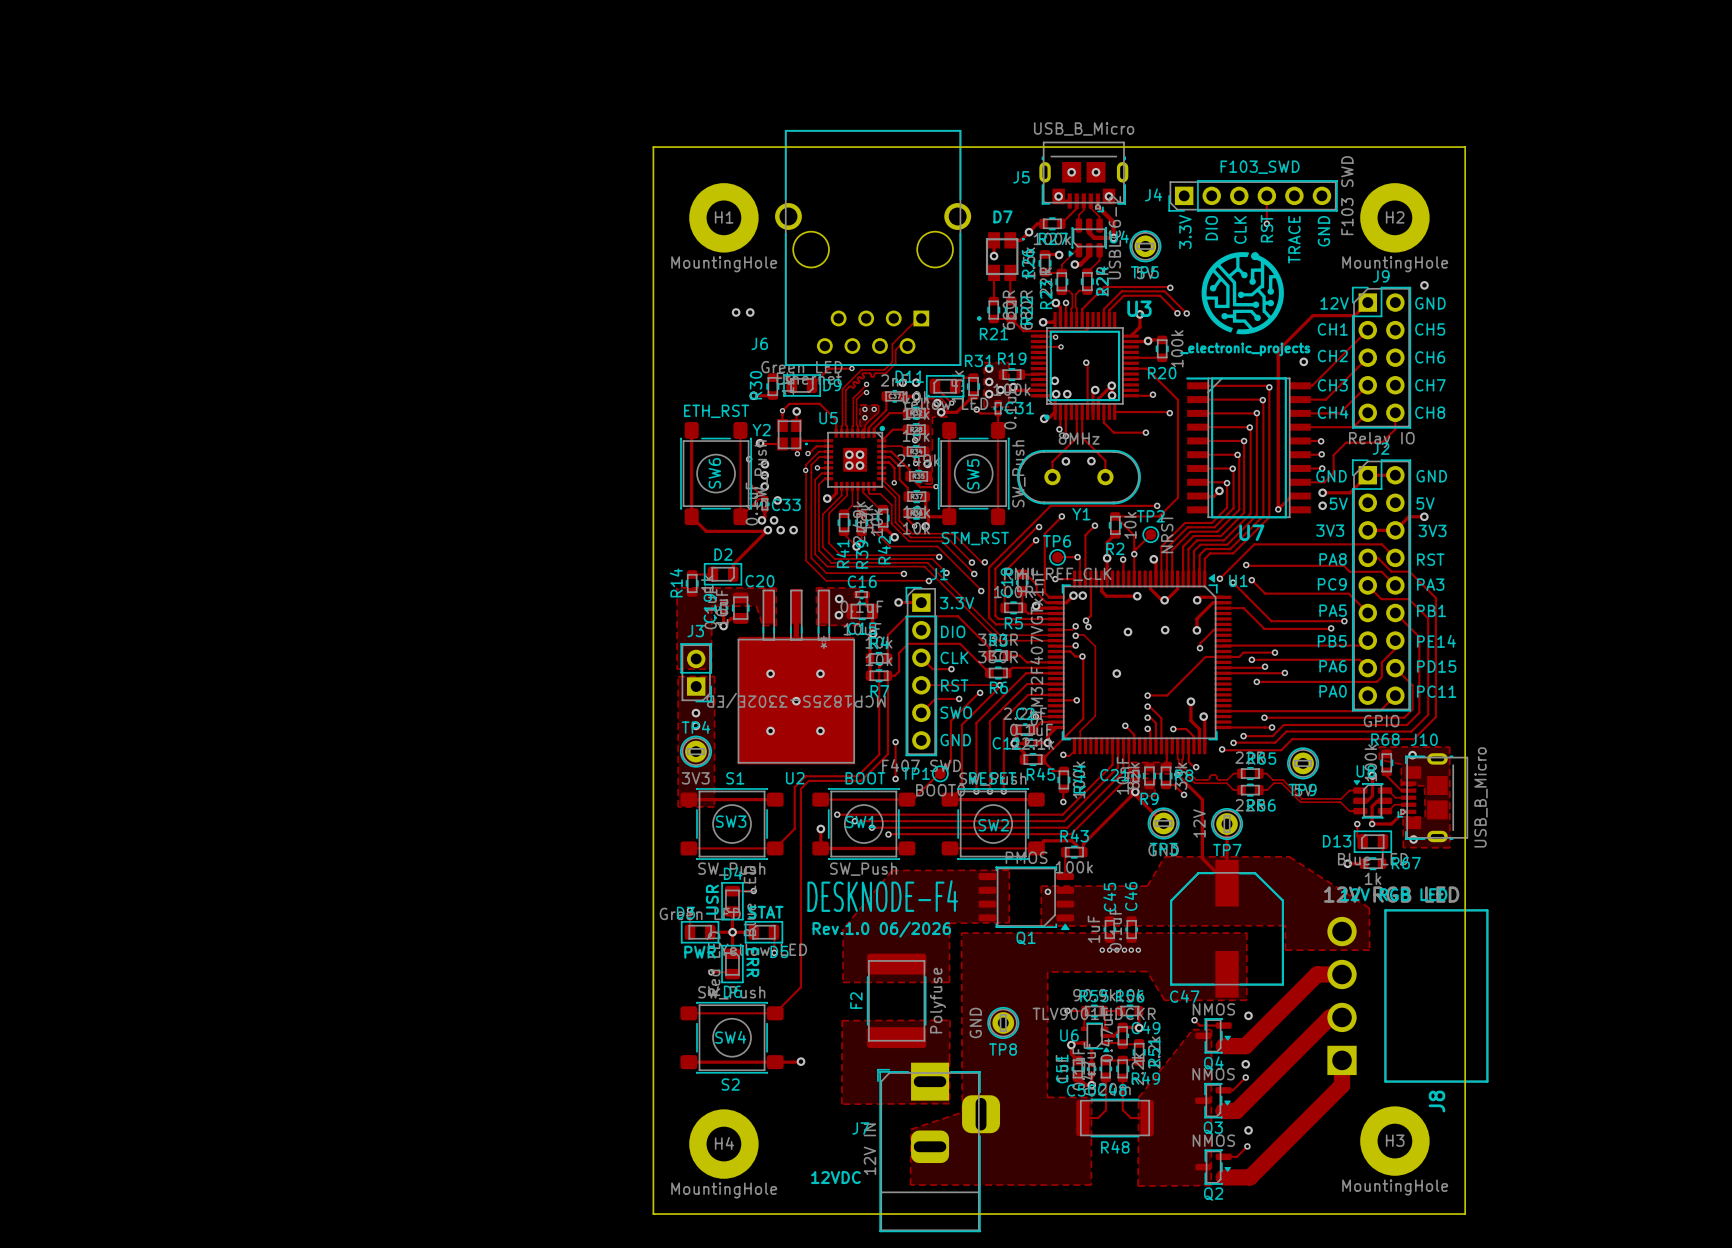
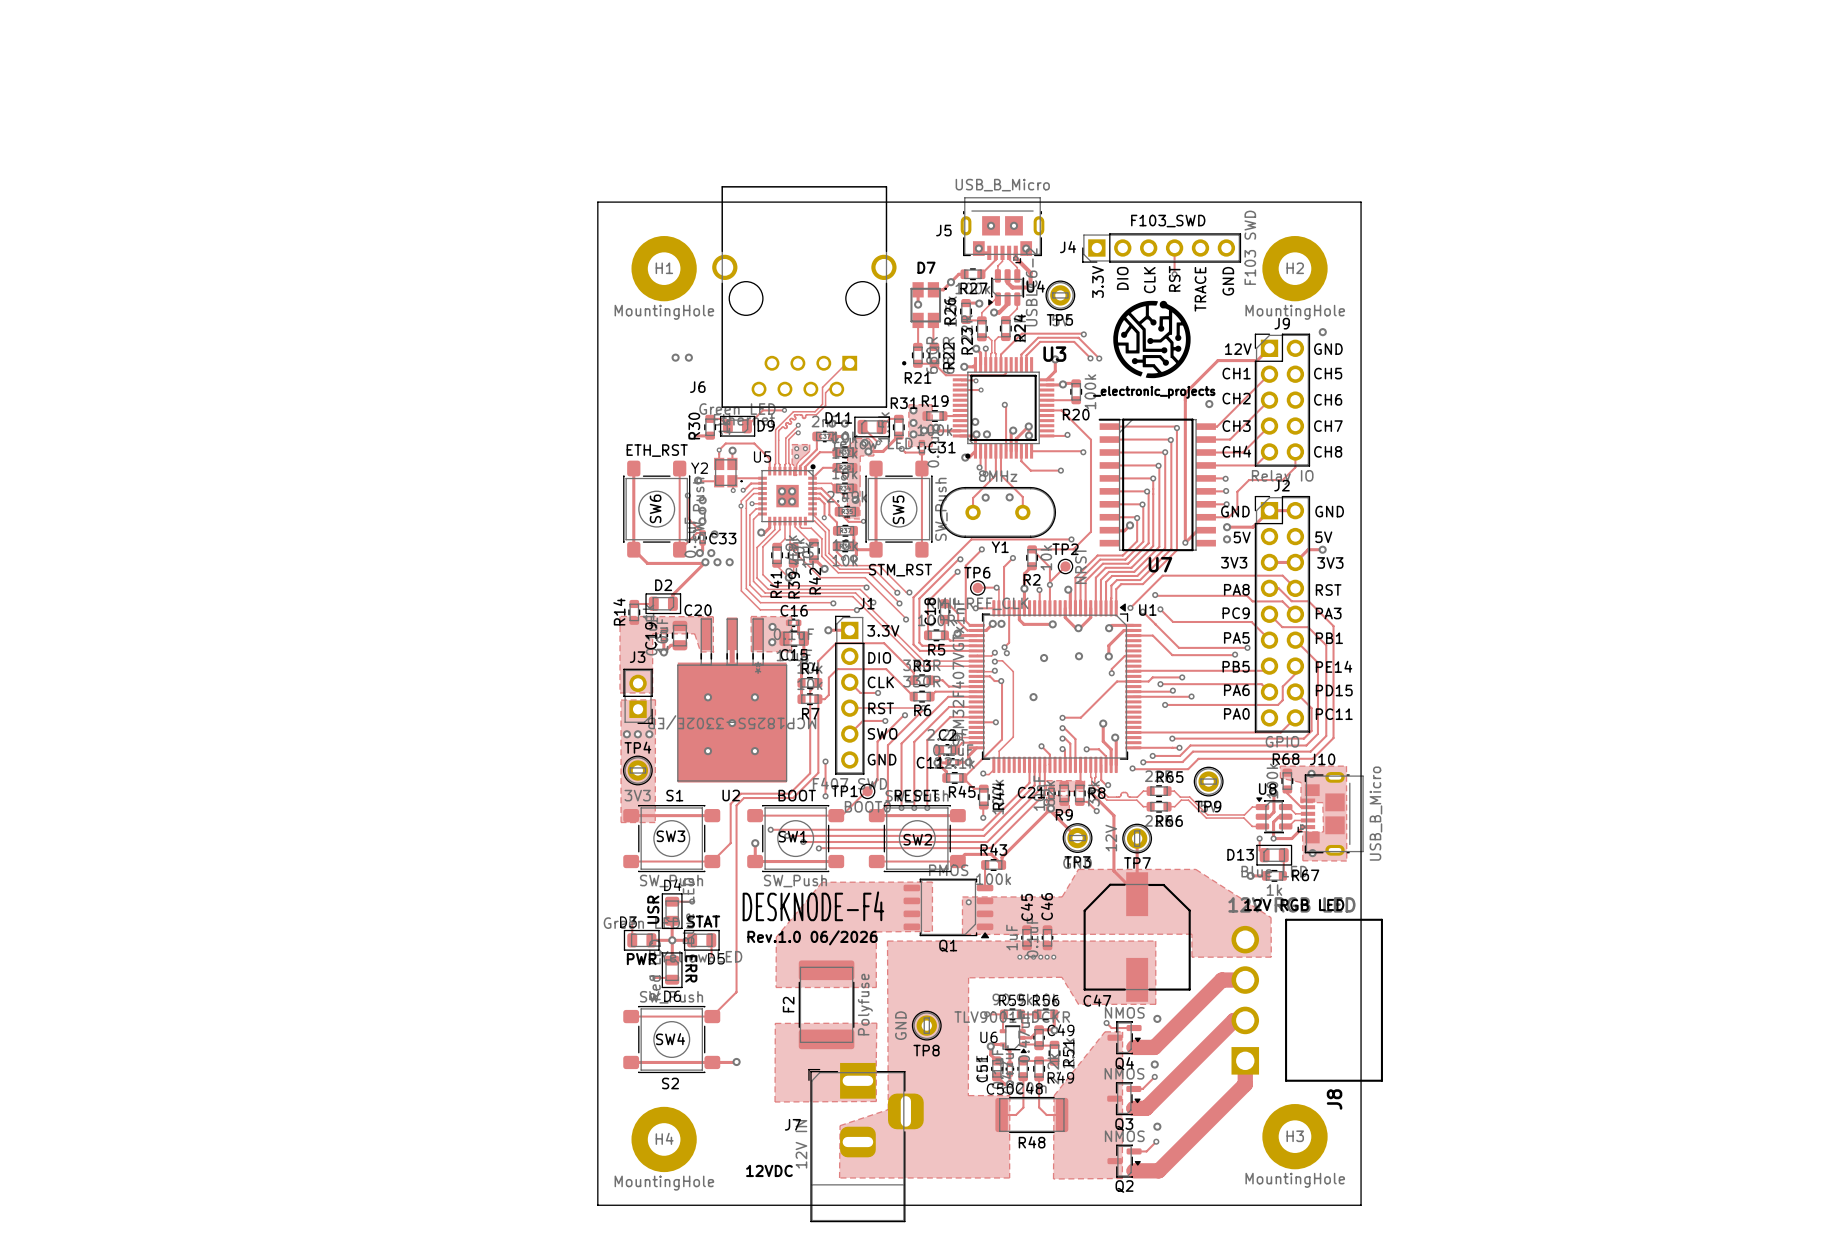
via: none -> (626, 734)
via: none -> (649, 734)
via: (695, 725) -> none

